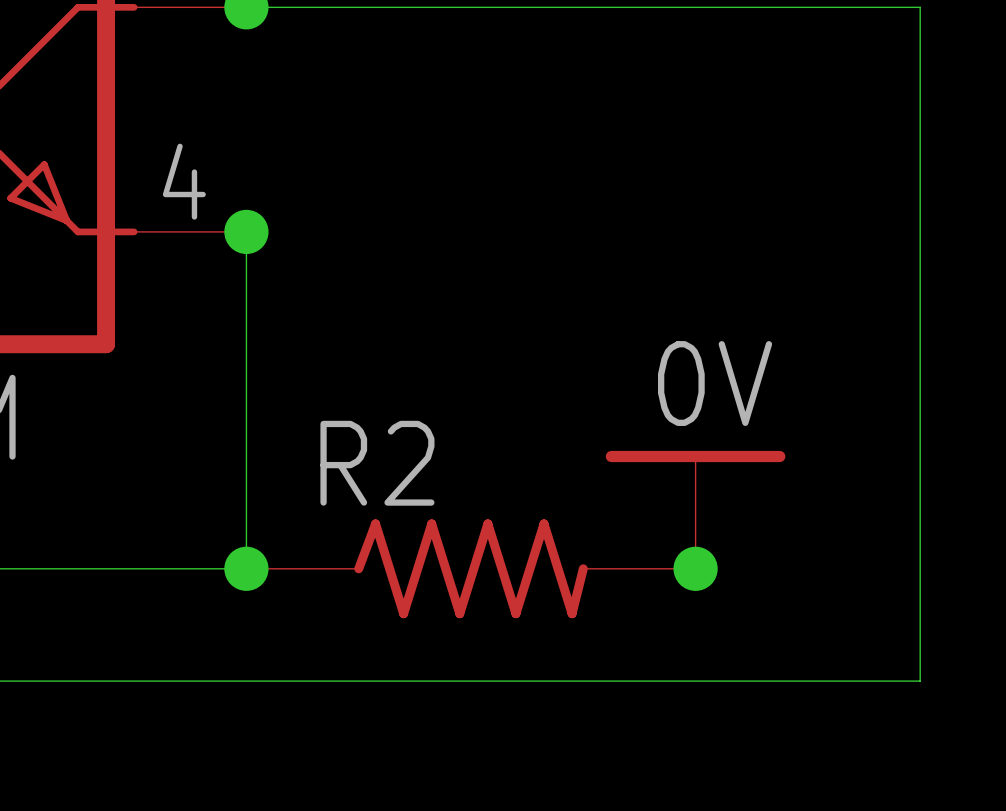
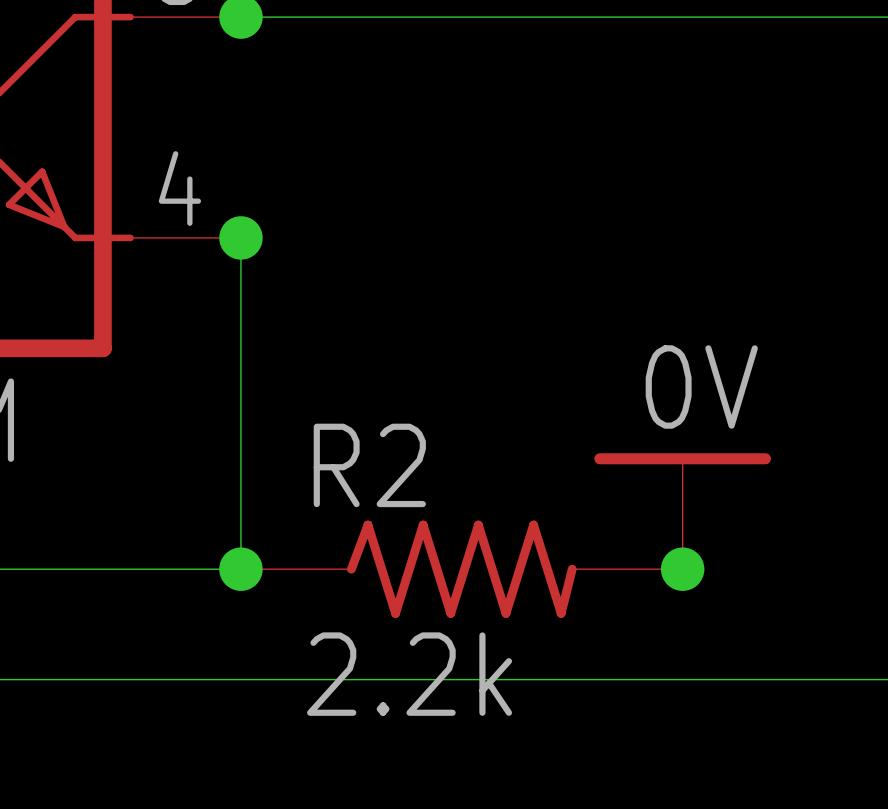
R2 value: none -> 2.2k (409, 674)

